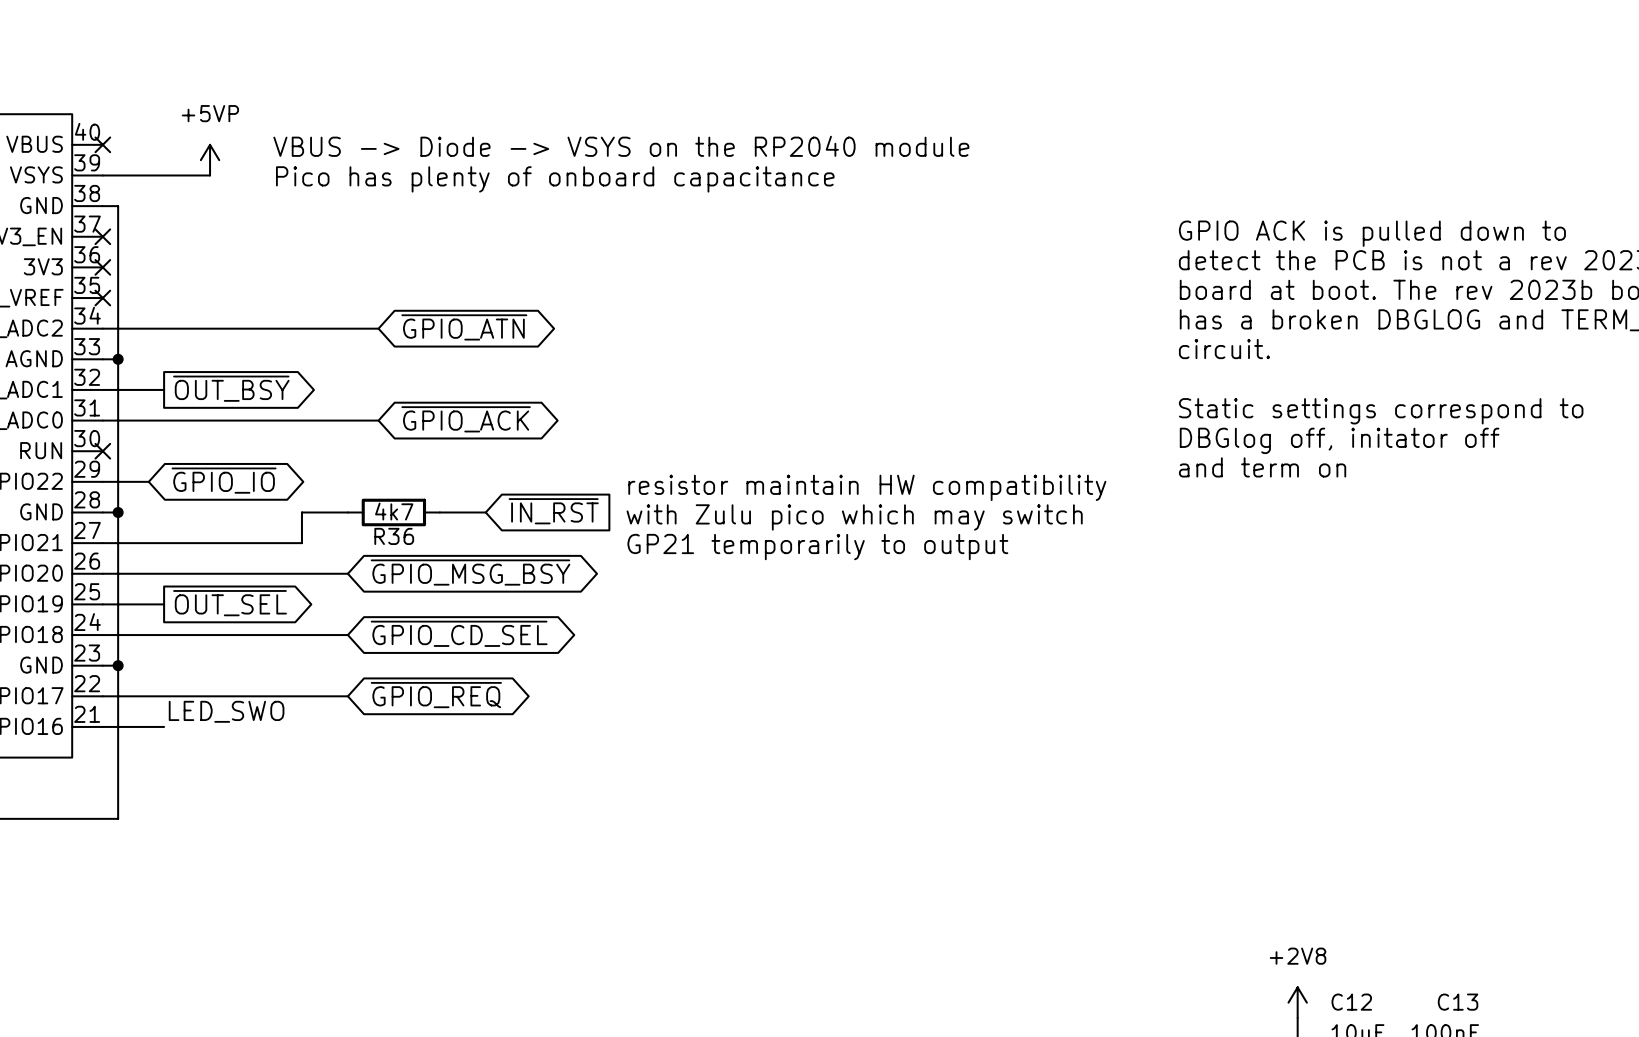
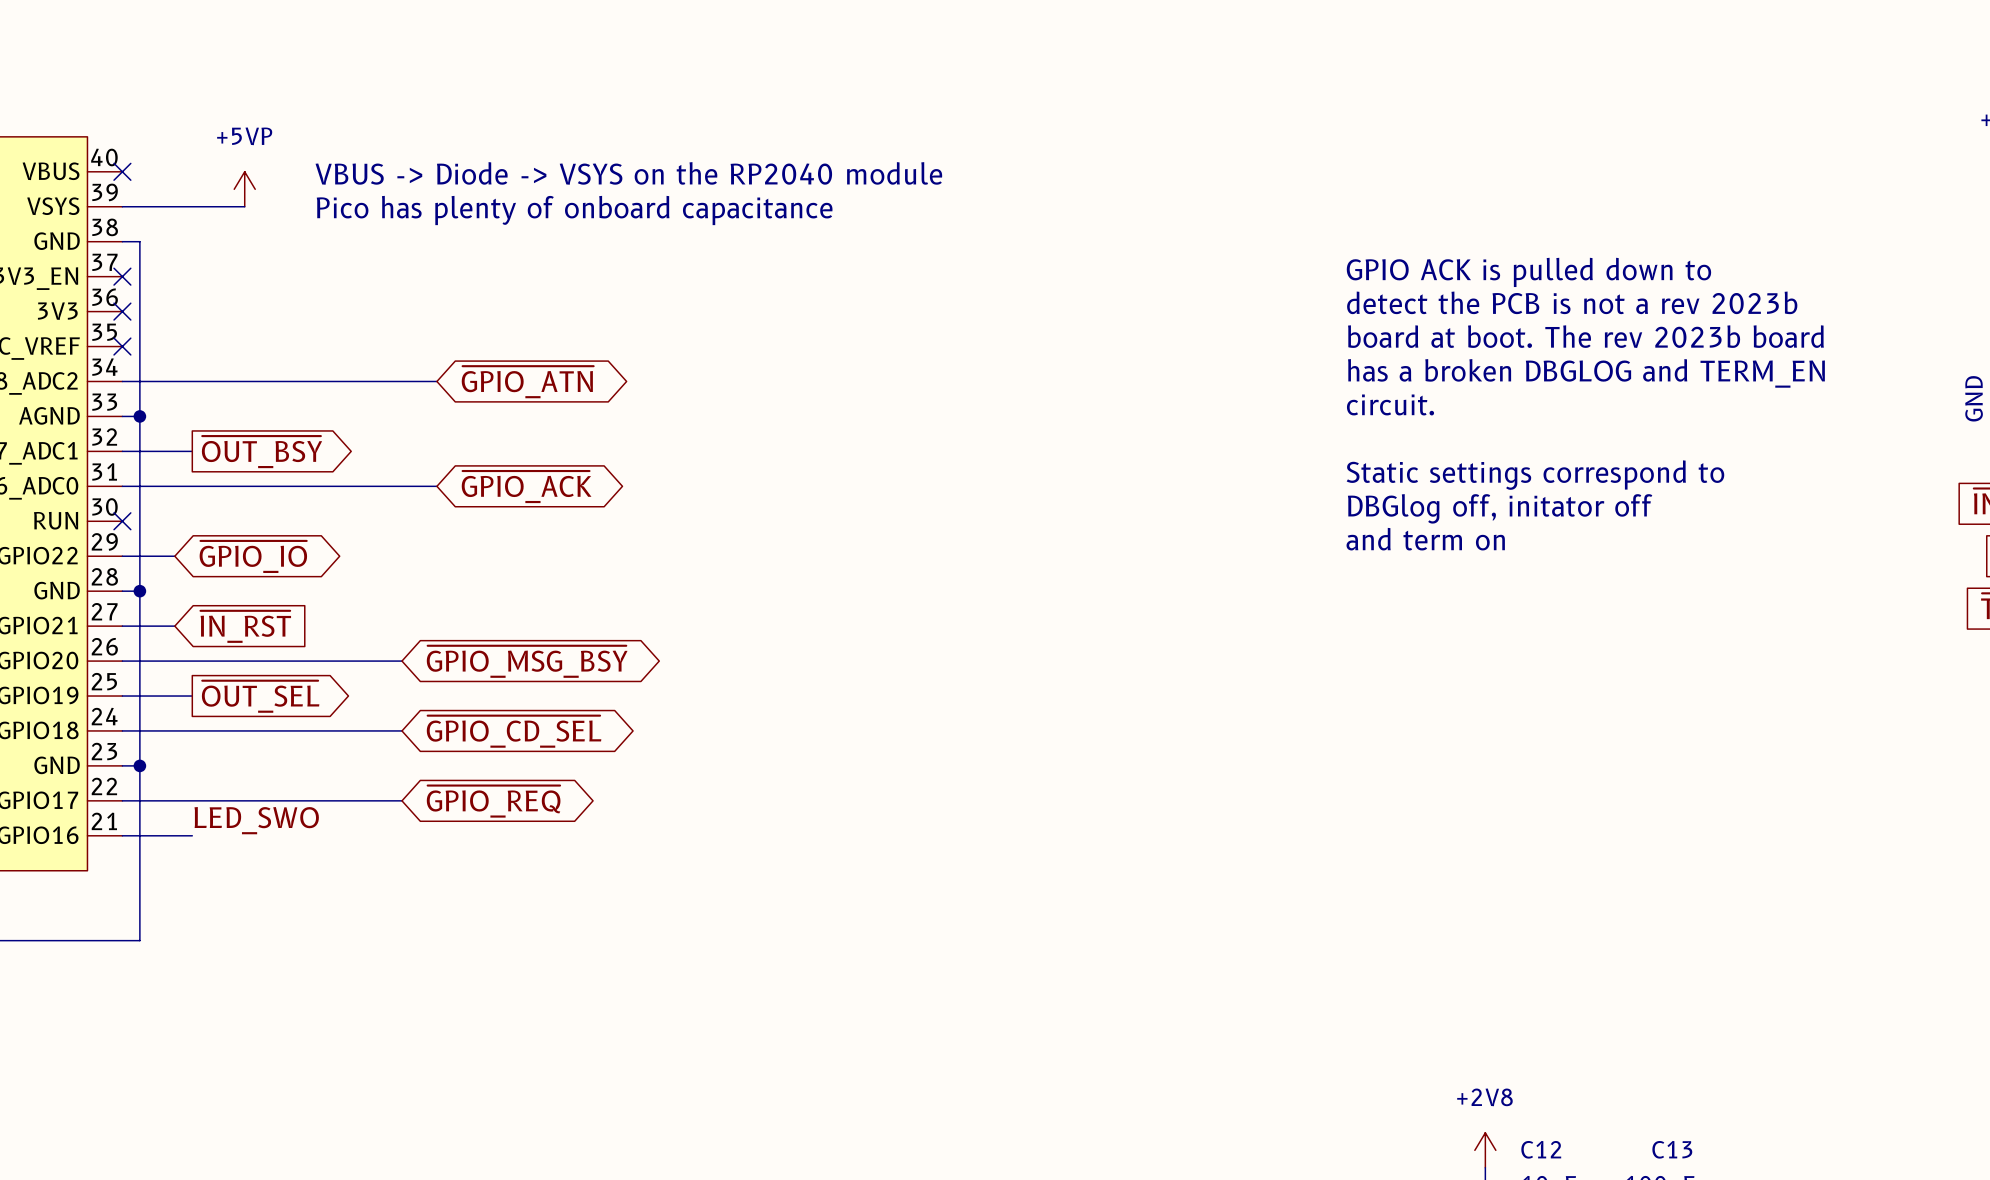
text: resistor maintain HW compatibility (867, 487) -> none
global label: ~{IN_RST} (553, 511) -> none
wire: (347, 512) (301, 512) (301, 543) (148, 543) -> none
R36: 4k7 (393, 512) -> none
wire: (439, 512) (485, 512) -> none
text: with Zulu pico which may switch (854, 517) -> none
global label: none -> ~{IN_RST} (245, 626)
text: GP21 temporarily to output (817, 547) -> none

